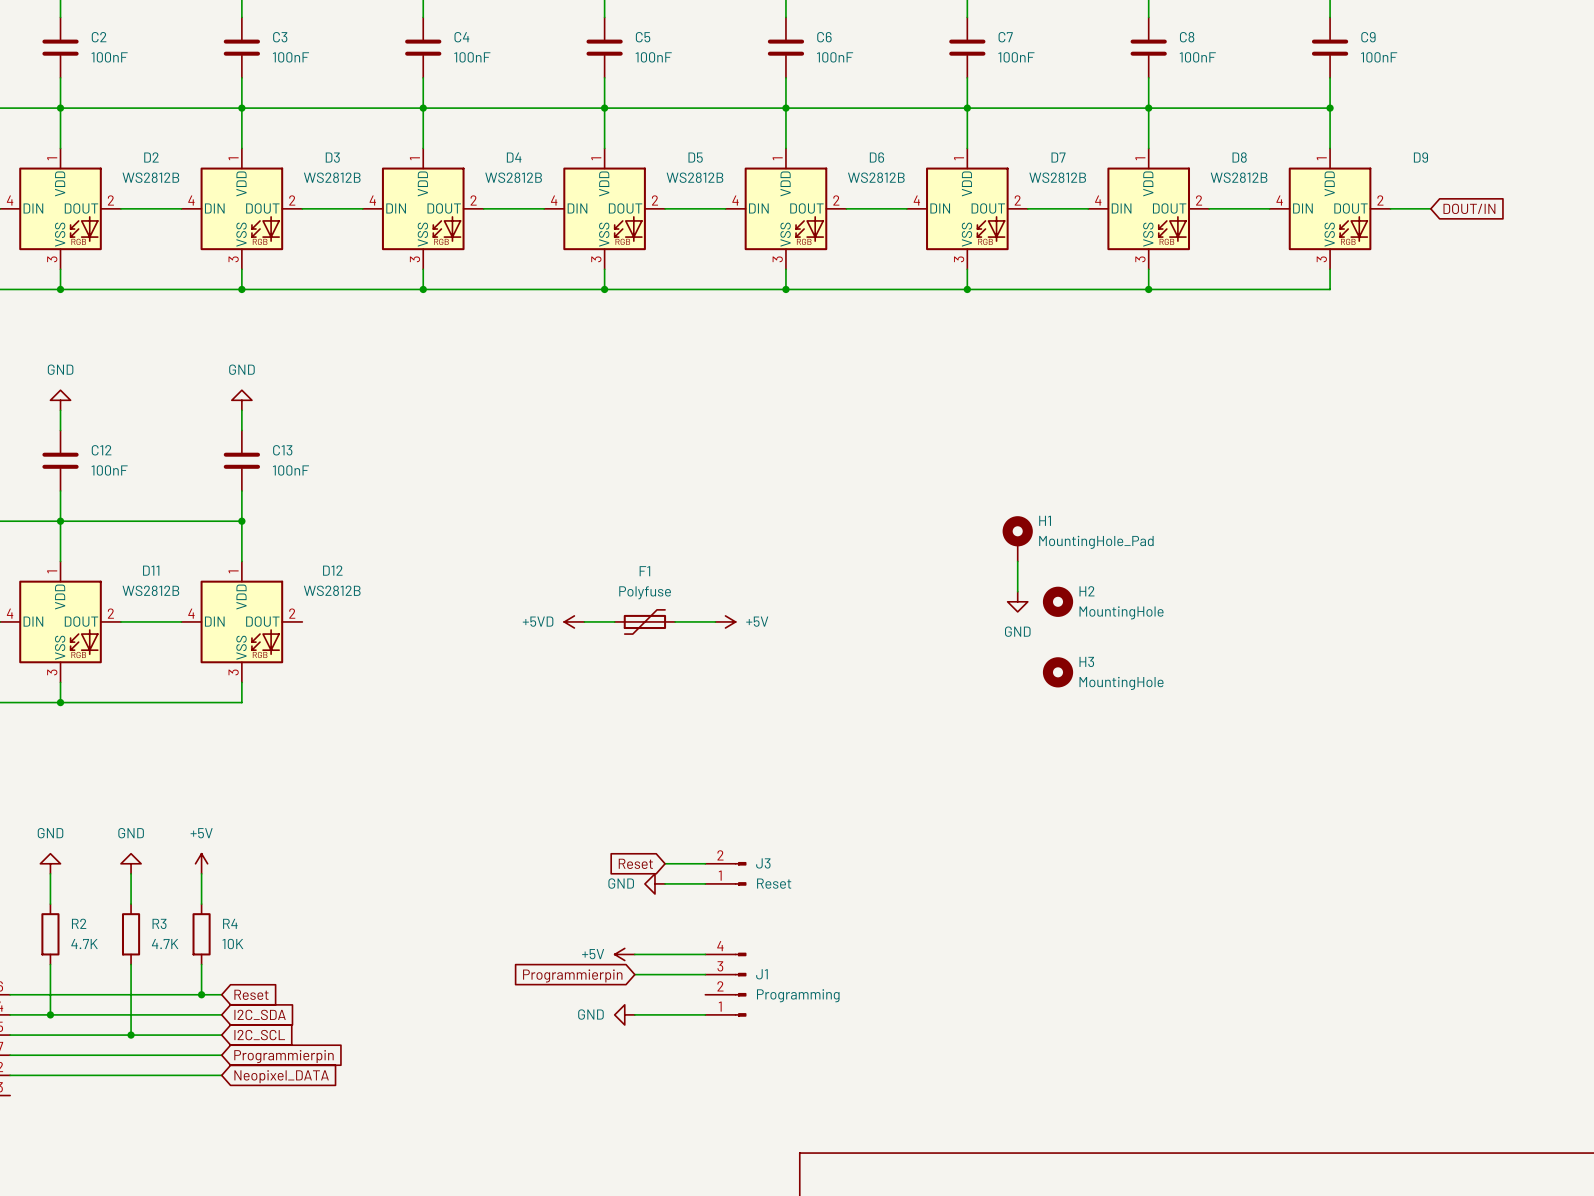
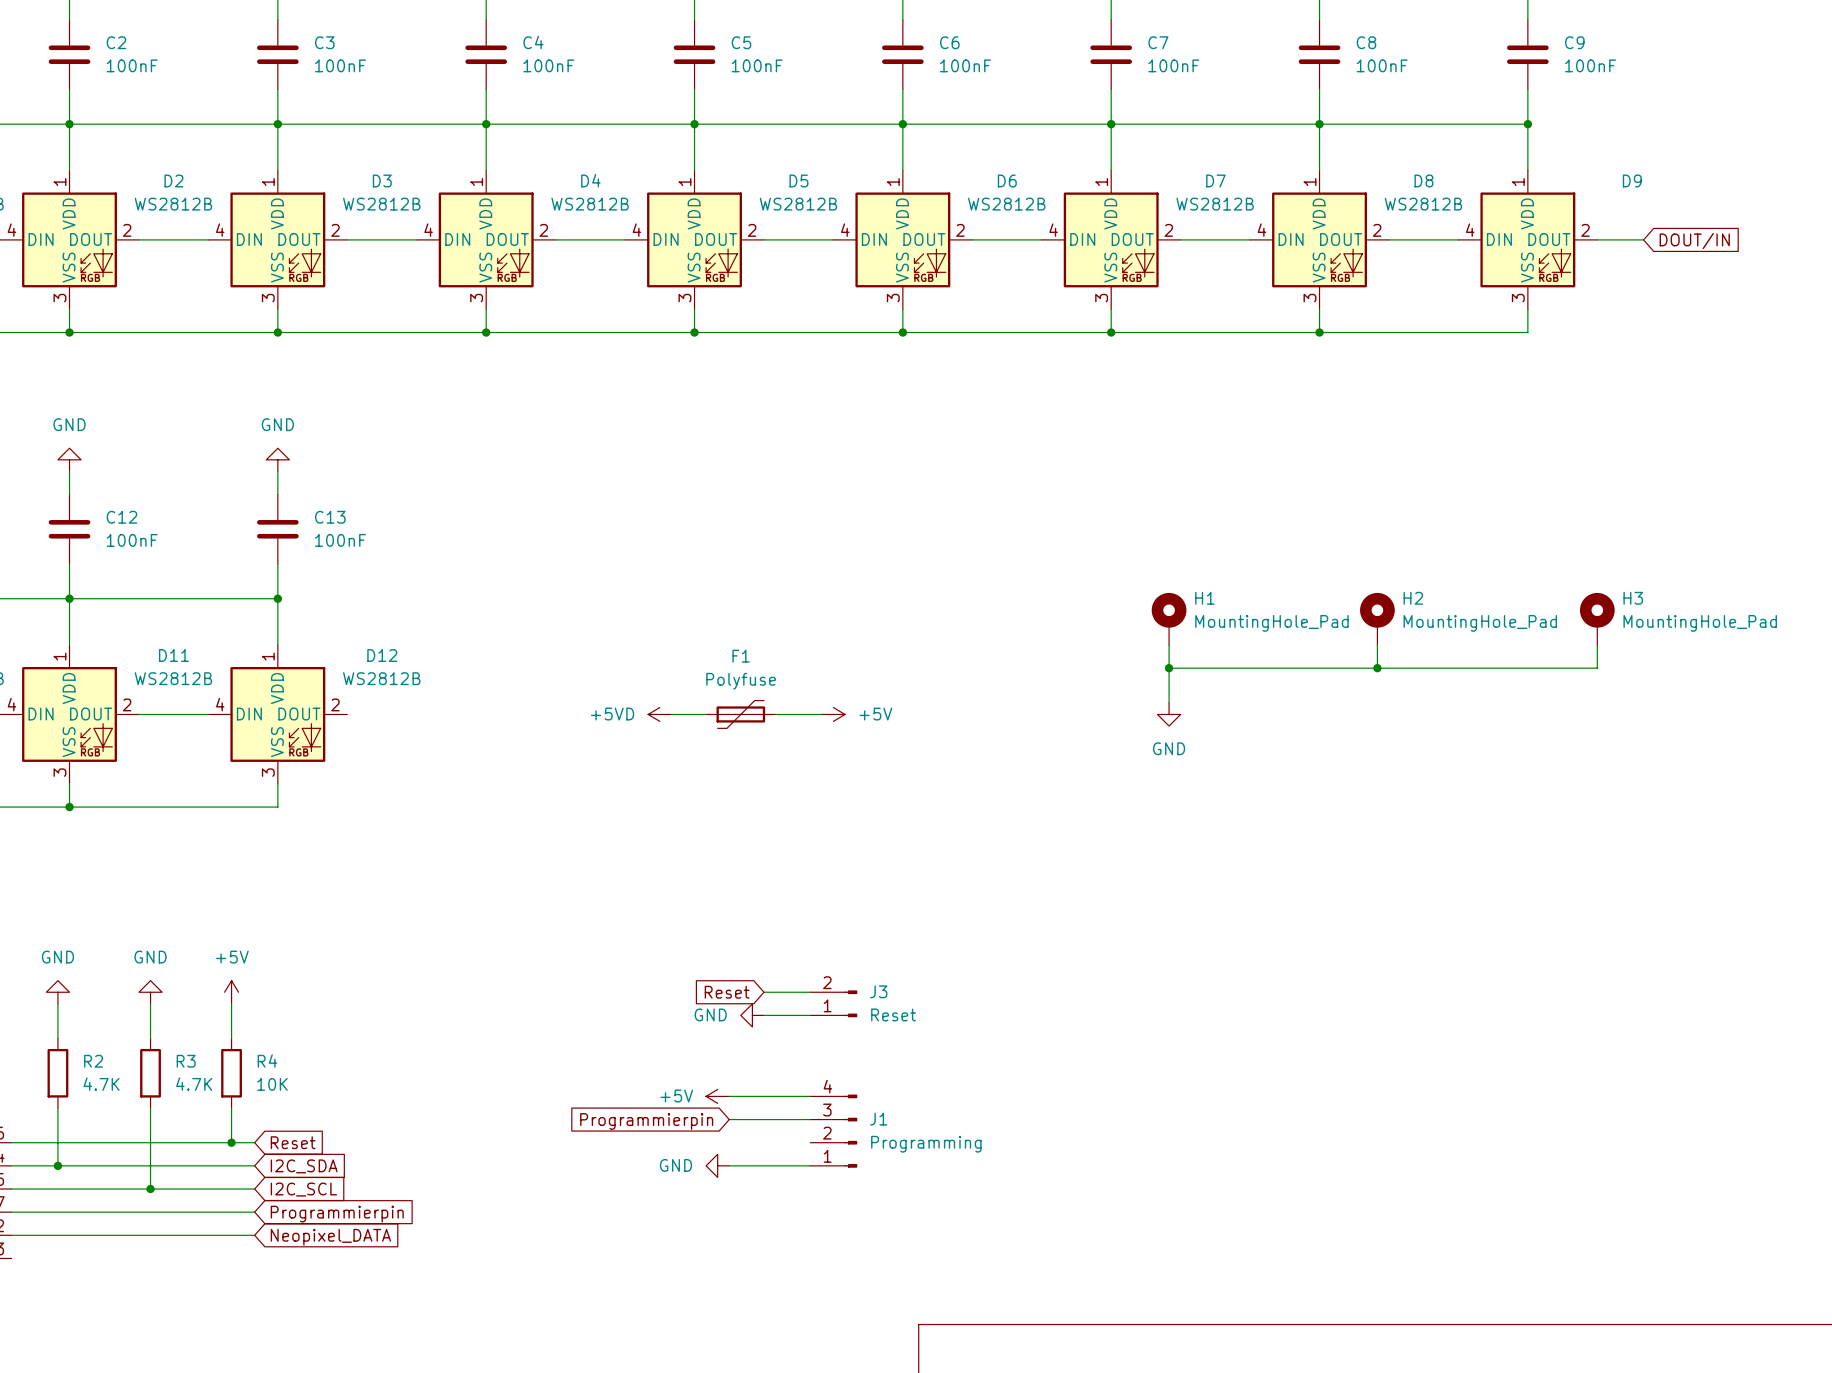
wire: none -> (1377, 645) (1377, 668)
wire: none -> (1597, 645) (1597, 668) (1169, 668)
junction: none -> (1169, 668)
junction: none -> (1377, 668)
H2 symbol: [1042, 586, 1074, 617] -> [1360, 592, 1395, 646]
power symbol position: GND (1017, 601) -> GND (1169, 714)
H2 value: MountingHole (1121, 612) -> MountingHole_Pad (1480, 623)
H3 symbol: [1042, 657, 1074, 688] -> [1579, 592, 1615, 646]
H3 value: MountingHole (1121, 683) -> MountingHole_Pad (1700, 623)

